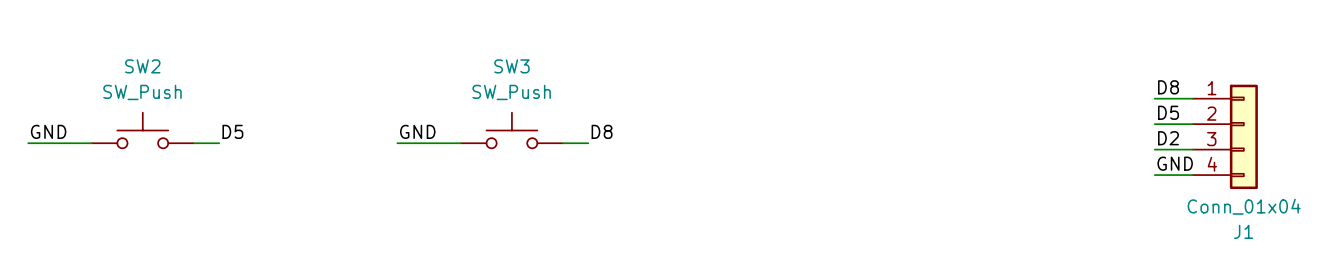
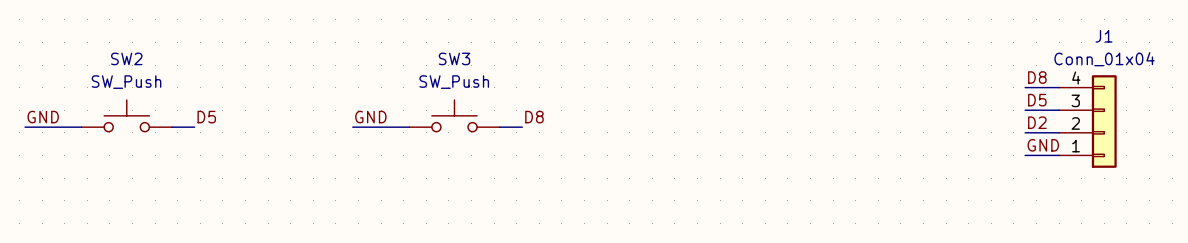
J1 flip: as is (1243, 136) -> up-down (1104, 121)

